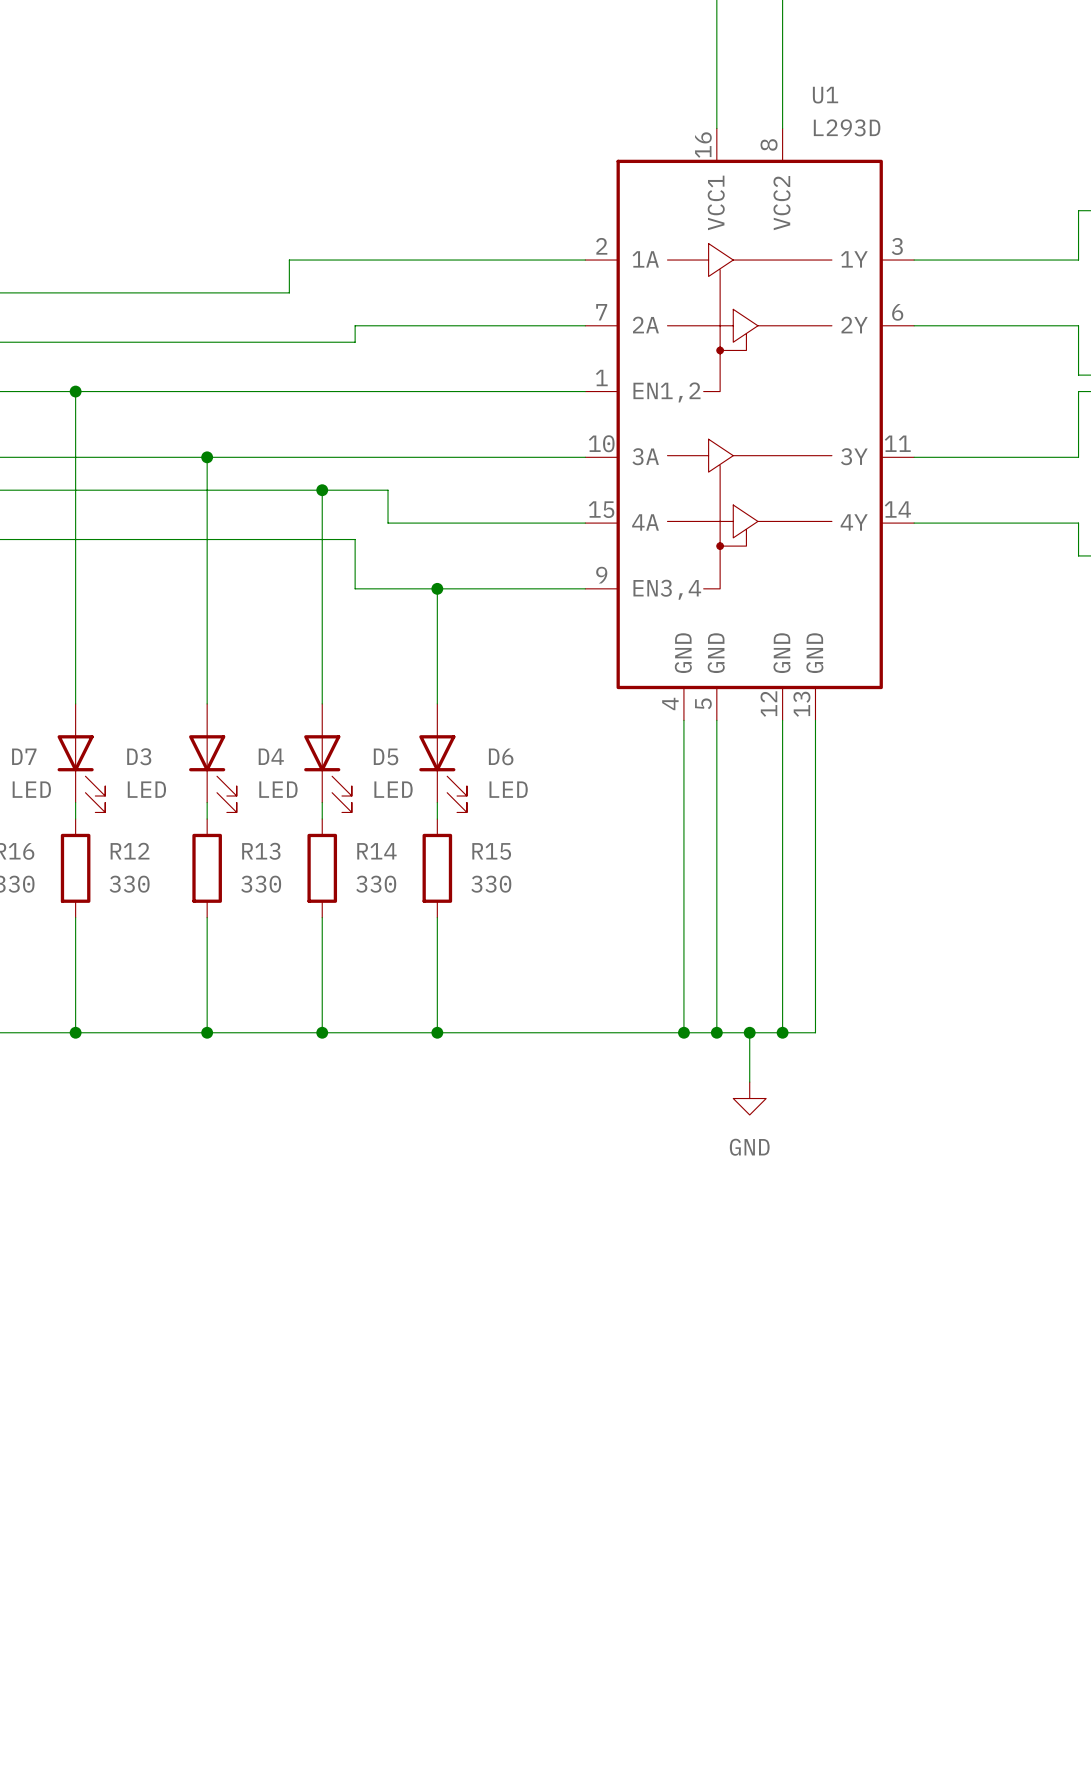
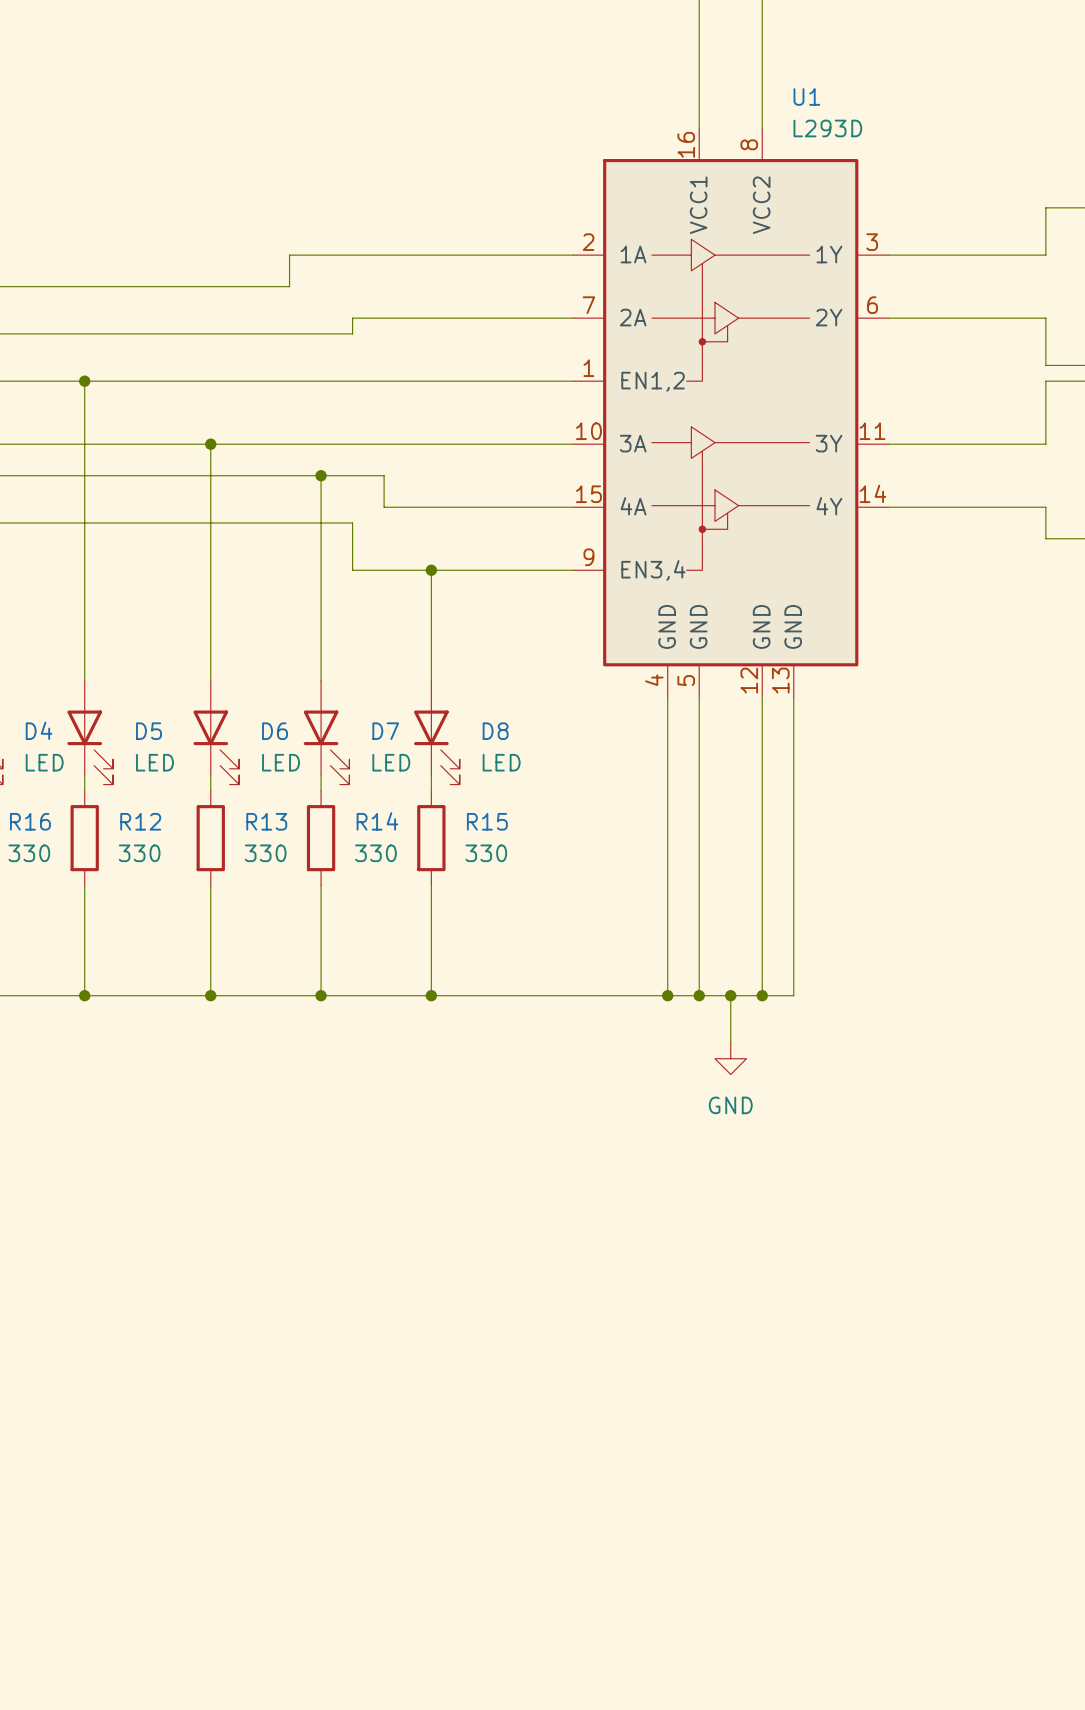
D7 name: D7 (24, 756) -> D4 (39, 730)
D3 name: D3 (139, 756) -> D5 (148, 731)
D4 name: D4 (271, 756) -> D6 (275, 731)
D5 name: D5 (386, 756) -> D7 (385, 731)
D6 name: D6 (501, 756) -> D8 (495, 731)

